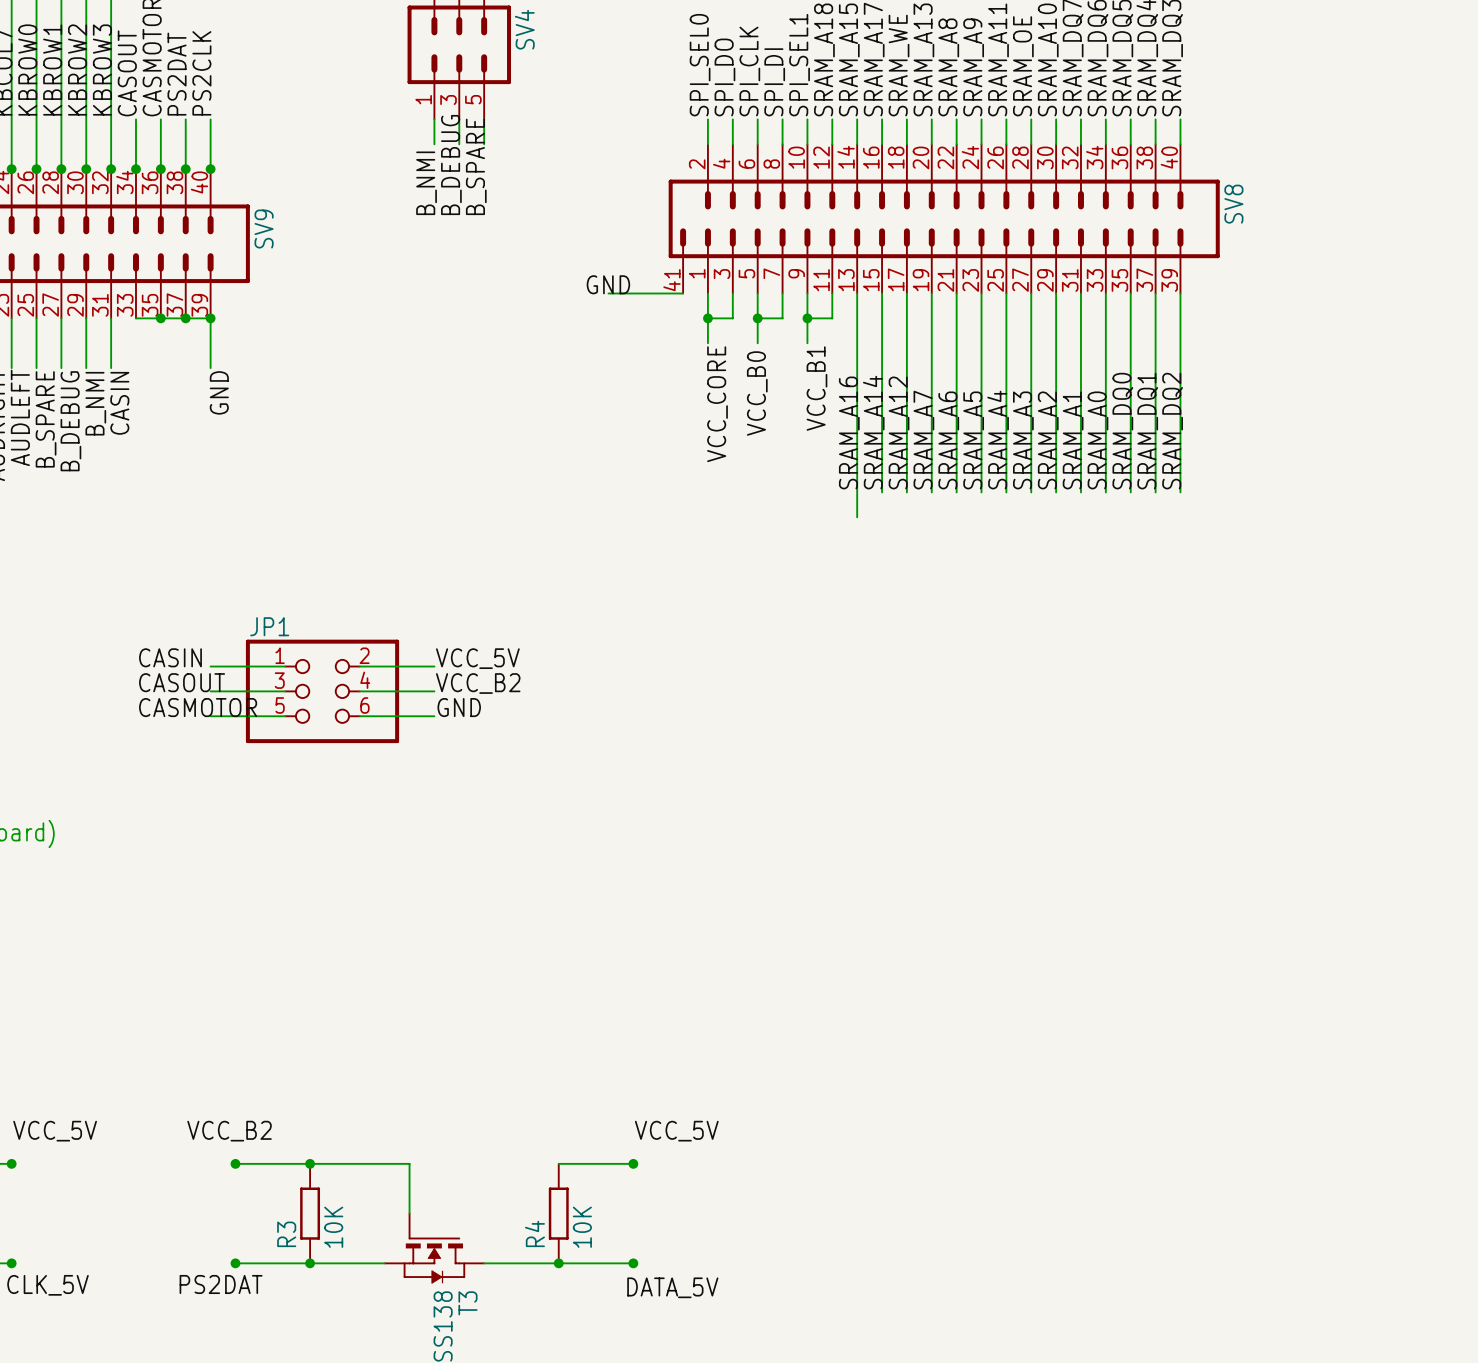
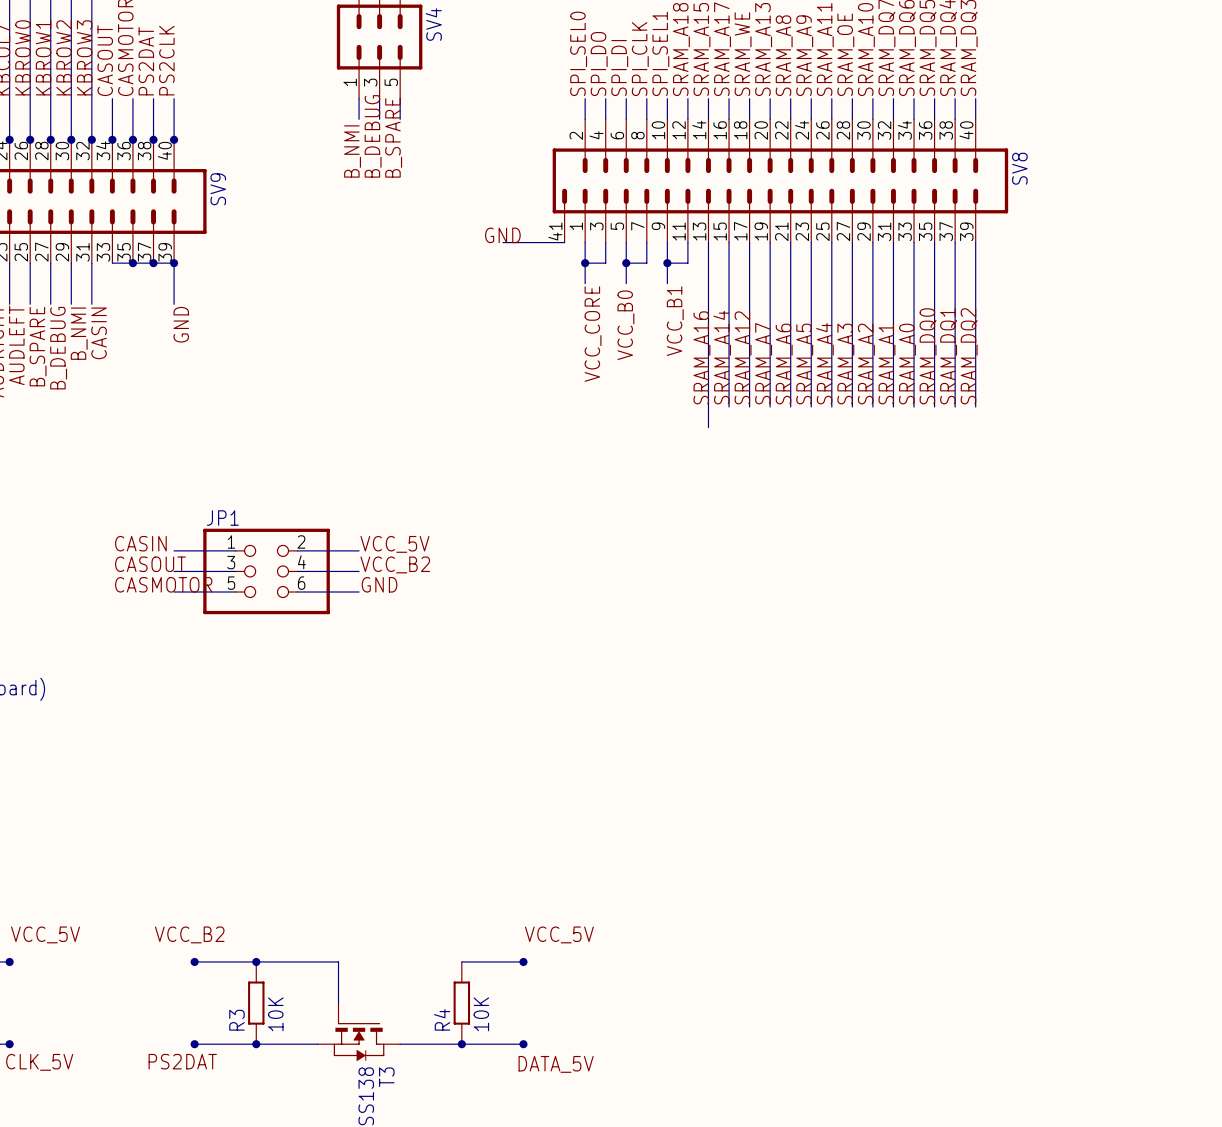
label: SPI_CLK (749, 71) -> SPI_DI (619, 68)
label: SPI_DI (774, 82) -> SPI_CLK (640, 59)

